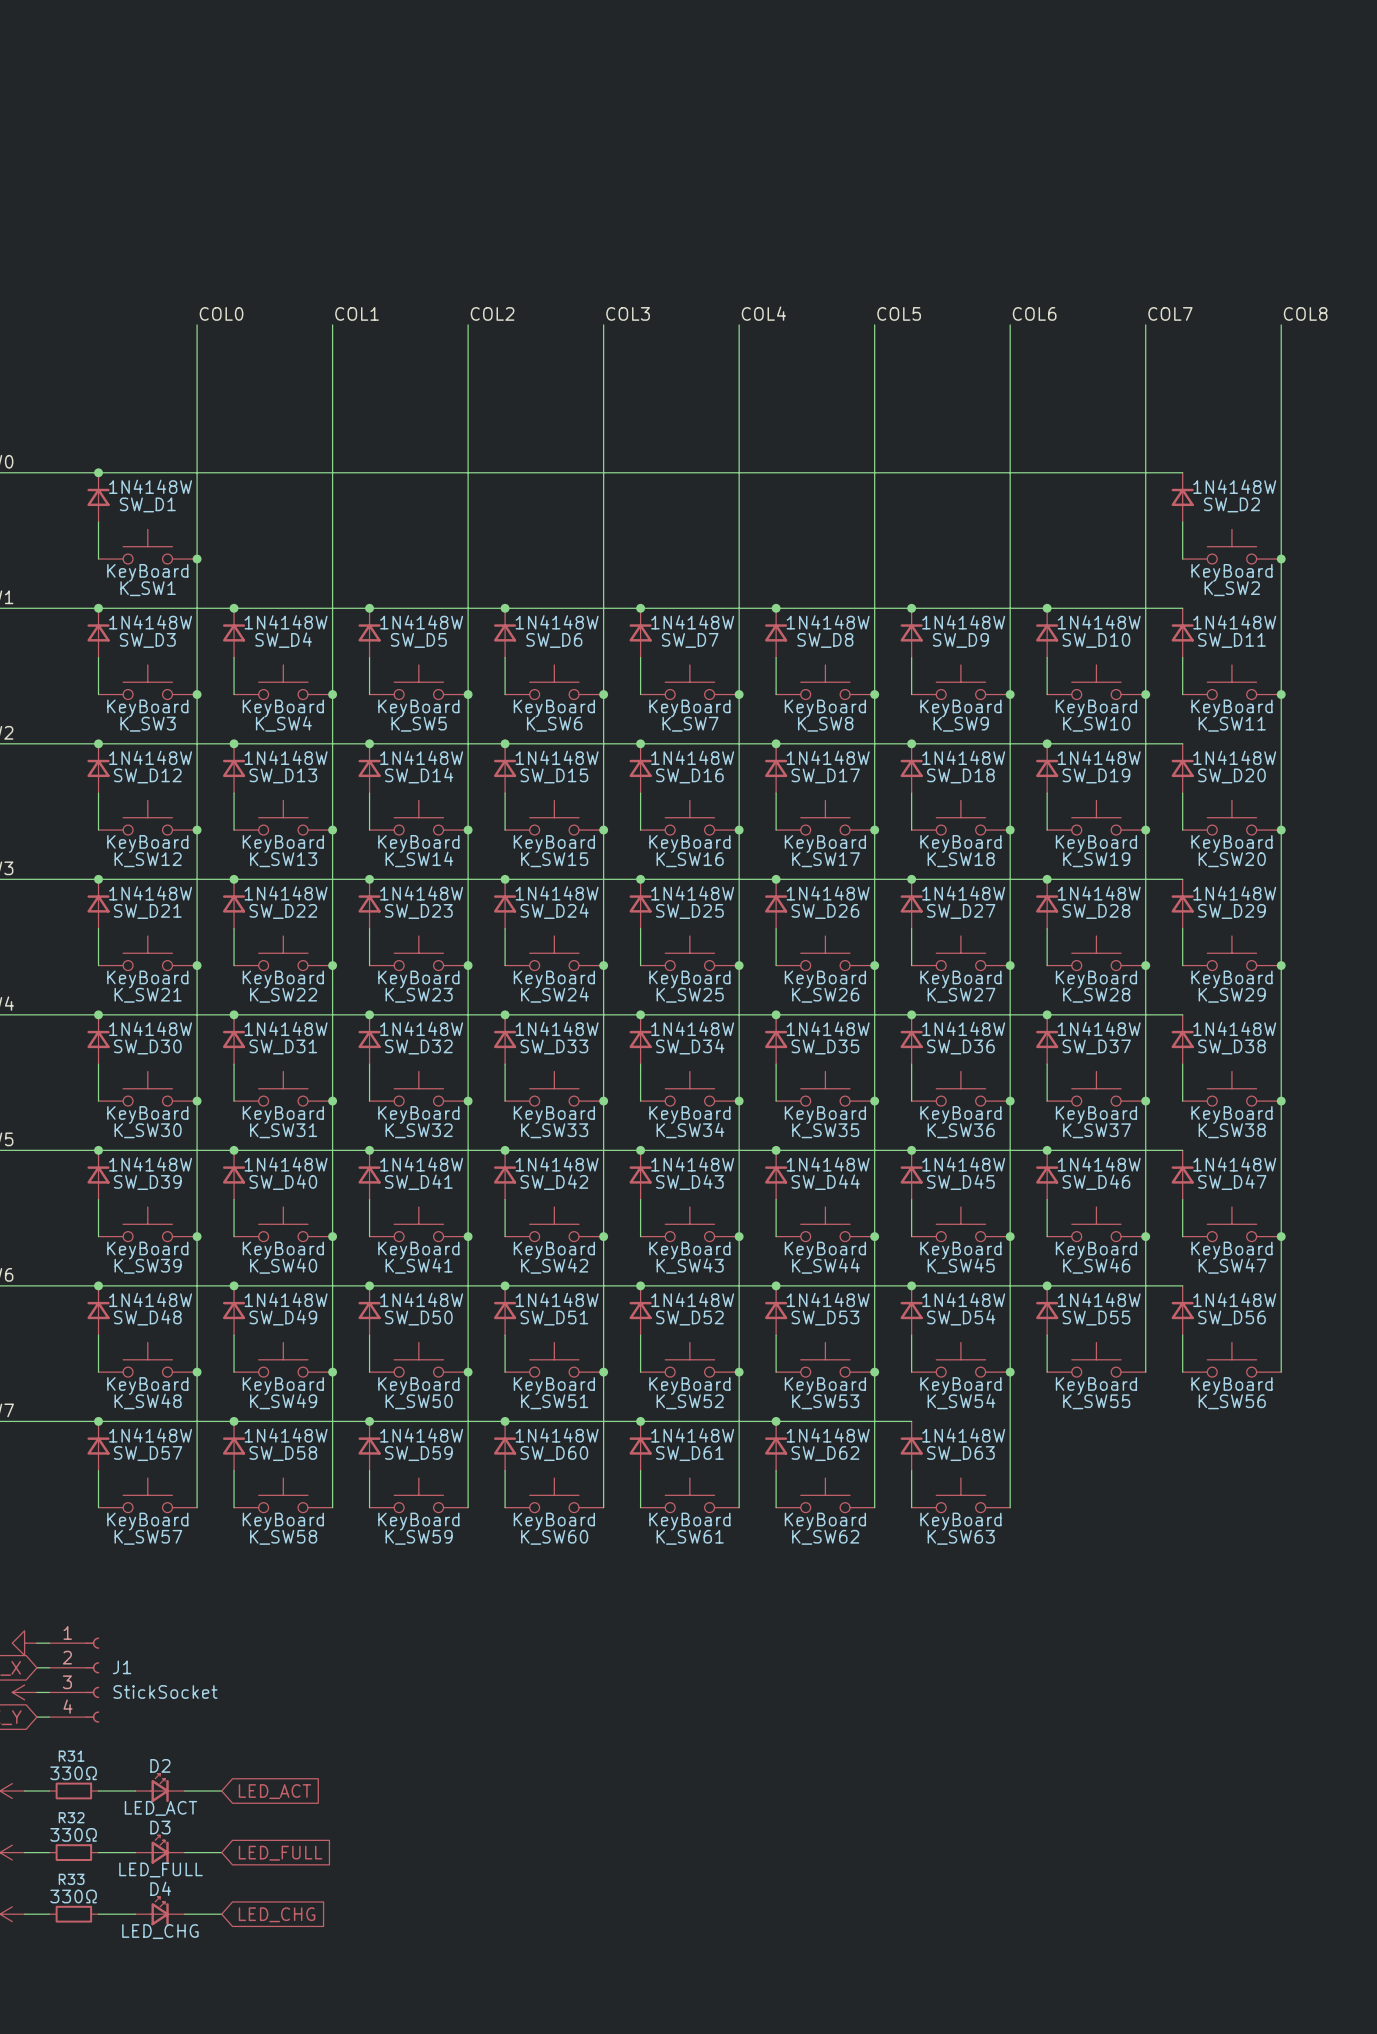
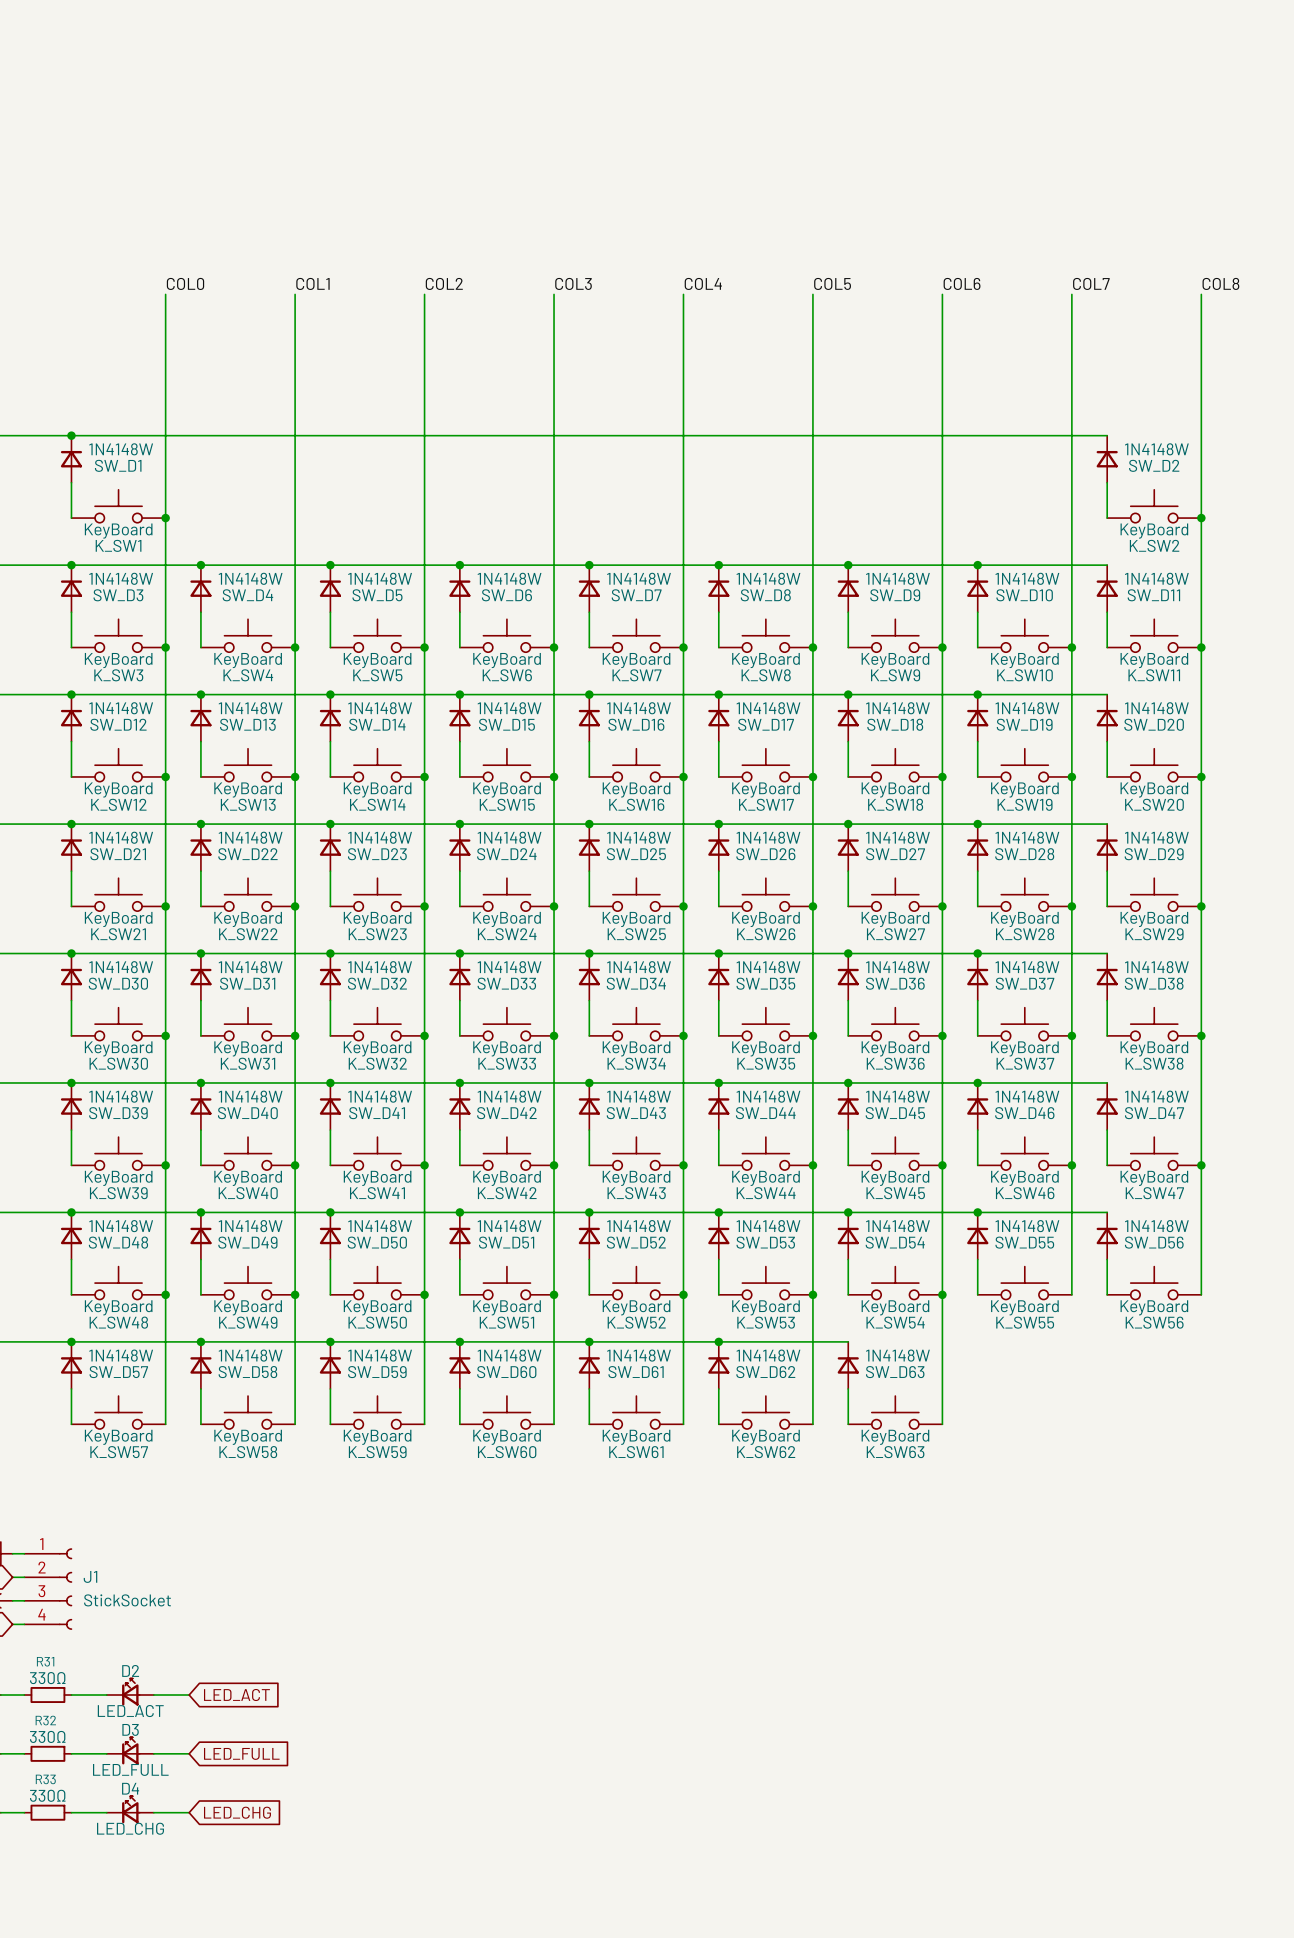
D2 flip: as is (159, 1787) -> left-right (130, 1692)
D3 flip: as is (159, 1849) -> left-right (130, 1750)
D4 flip: as is (159, 1911) -> left-right (130, 1809)

